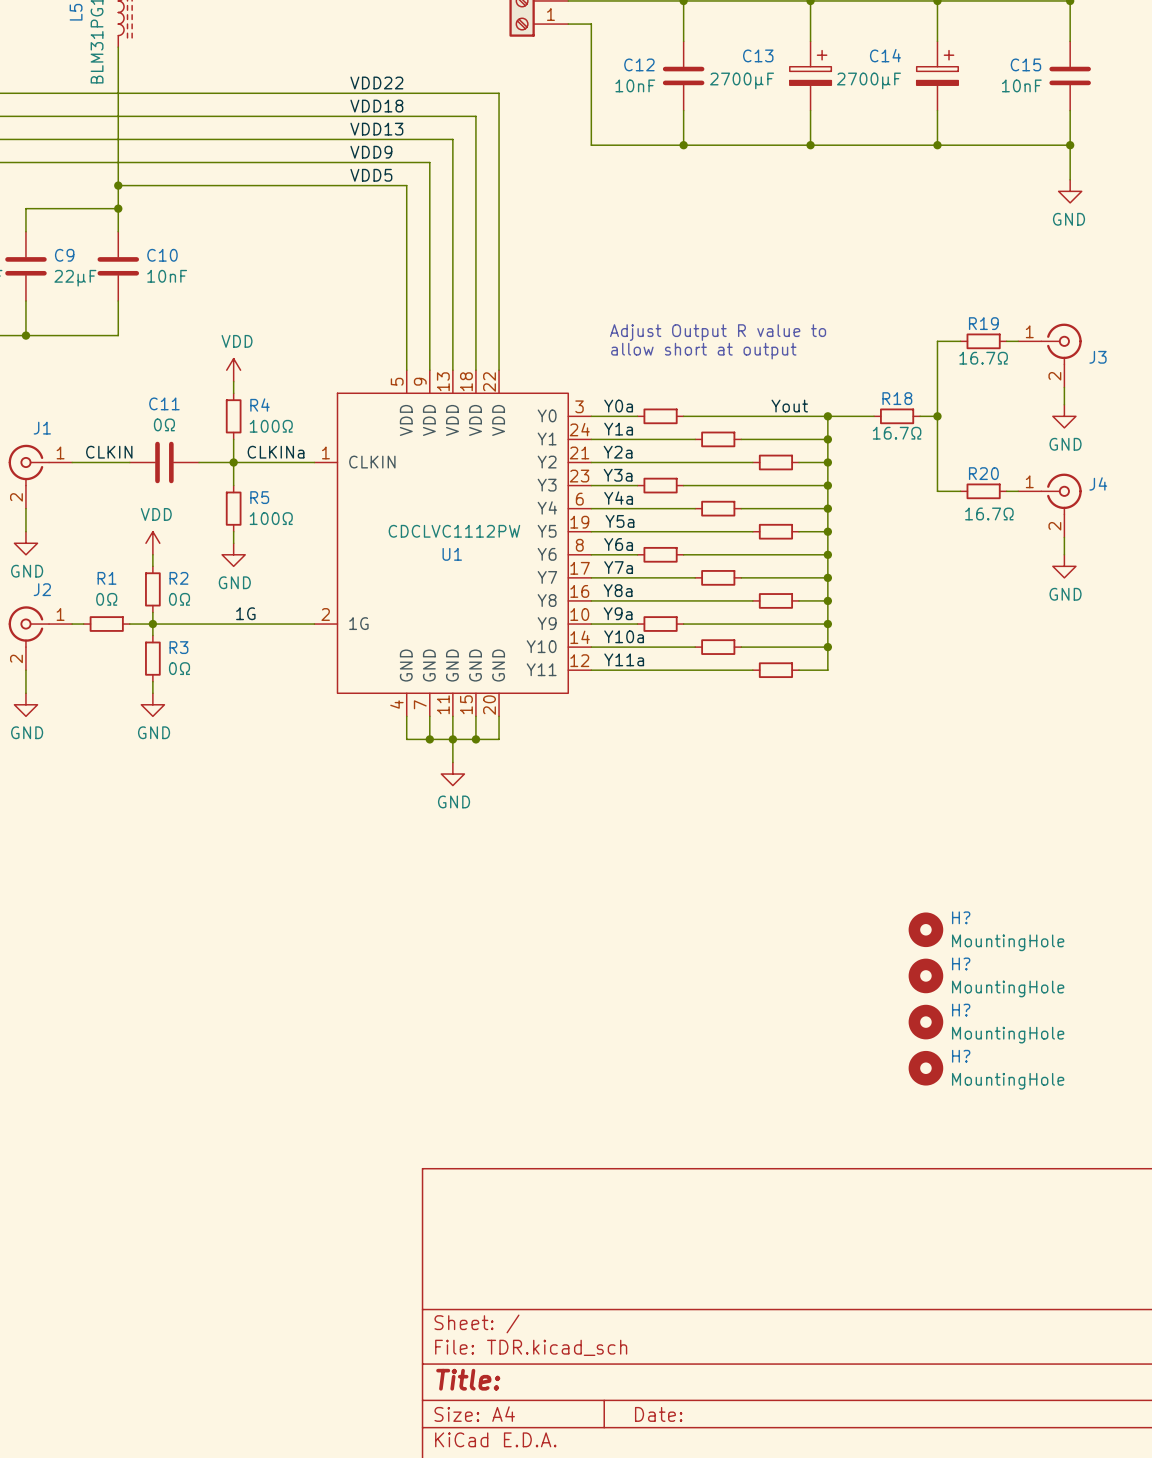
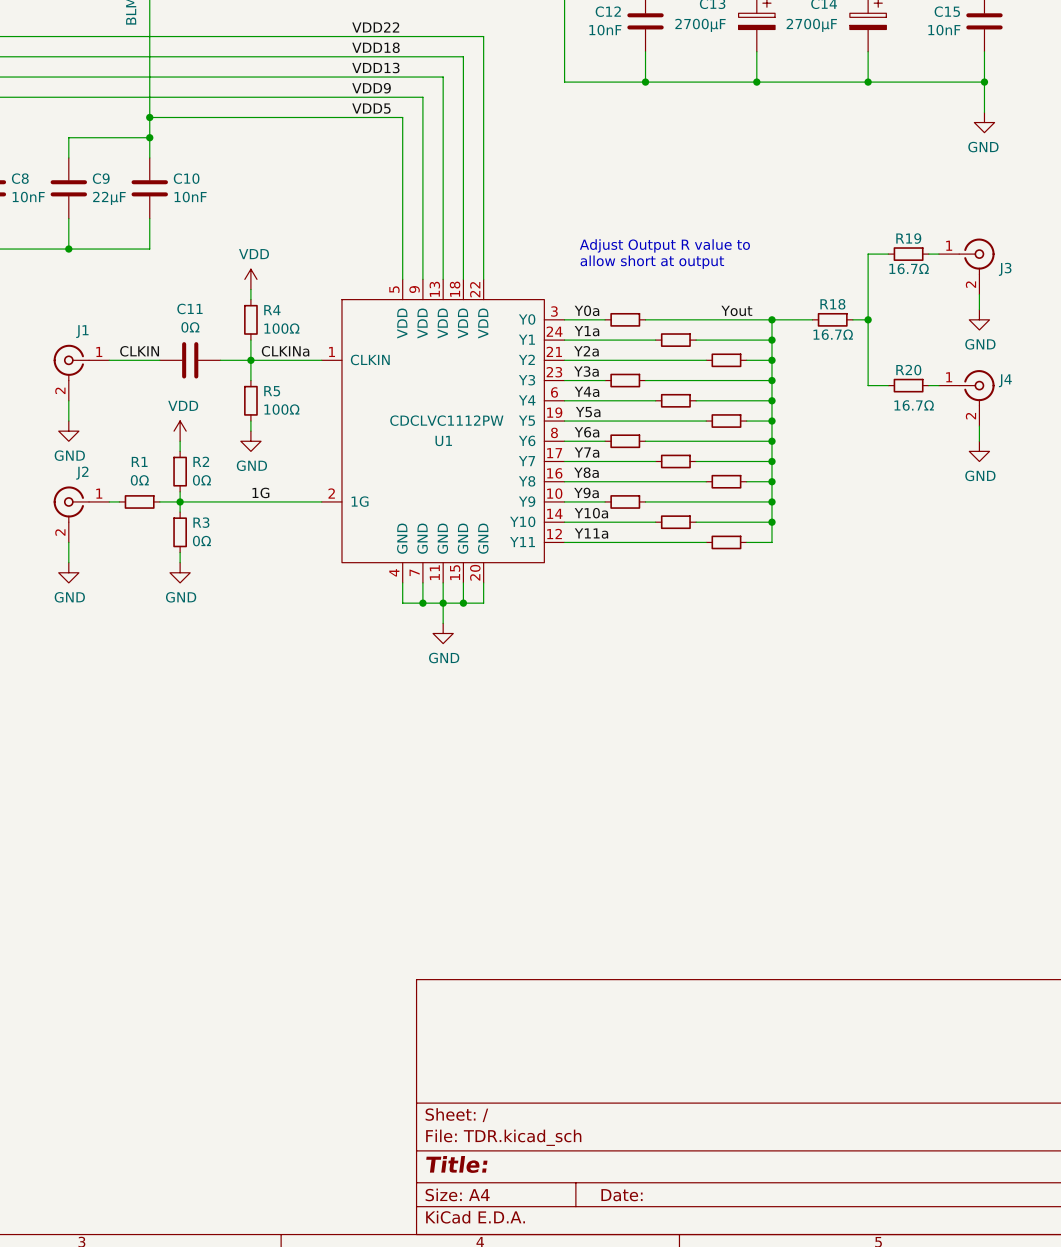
H?: MountingHole (925, 929) -> none
H?: MountingHole (925, 975) -> none
H?: MountingHole (925, 1022) -> none
H?: MountingHole (925, 1068) -> none

